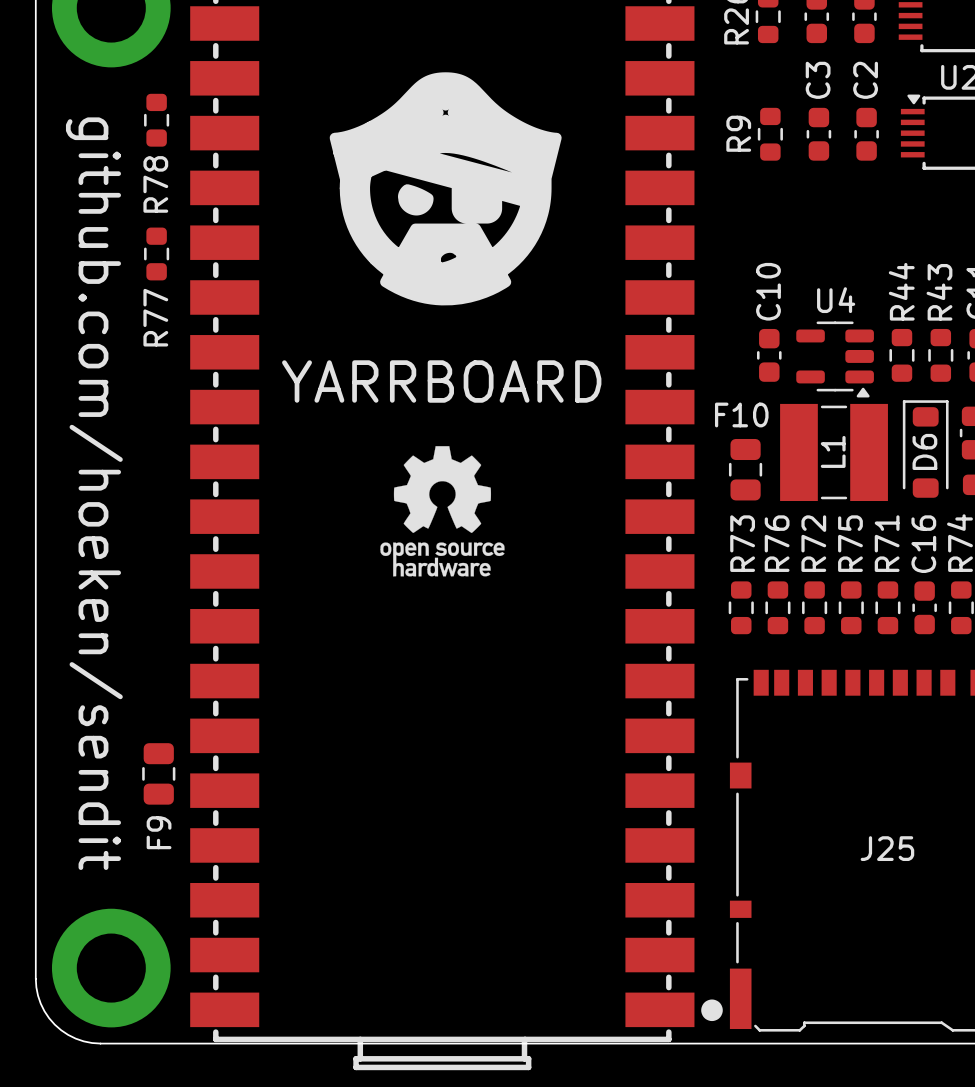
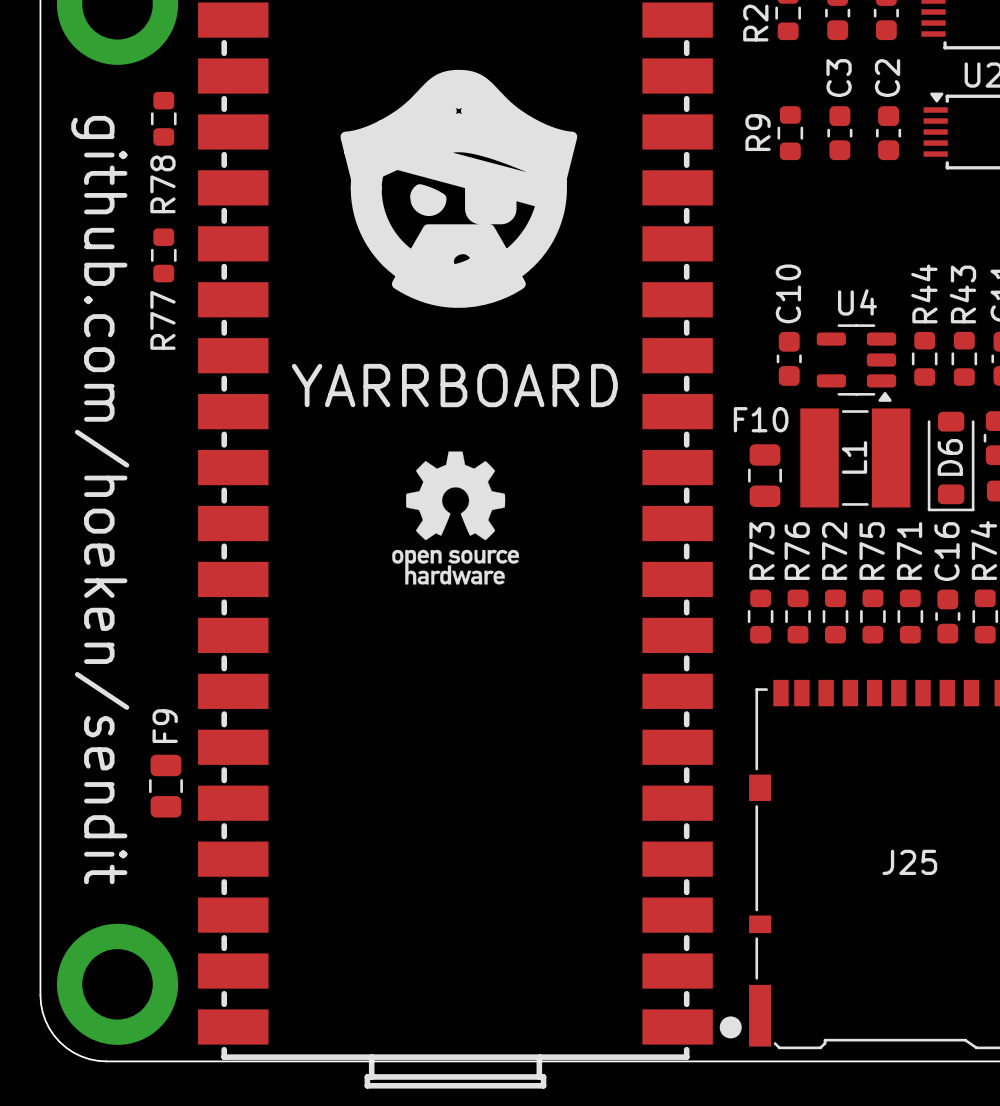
D6 rotation: 0° (925, 449) -> 180° (951, 461)
F9 name position: F9 (159, 832) -> F9 (165, 726)

